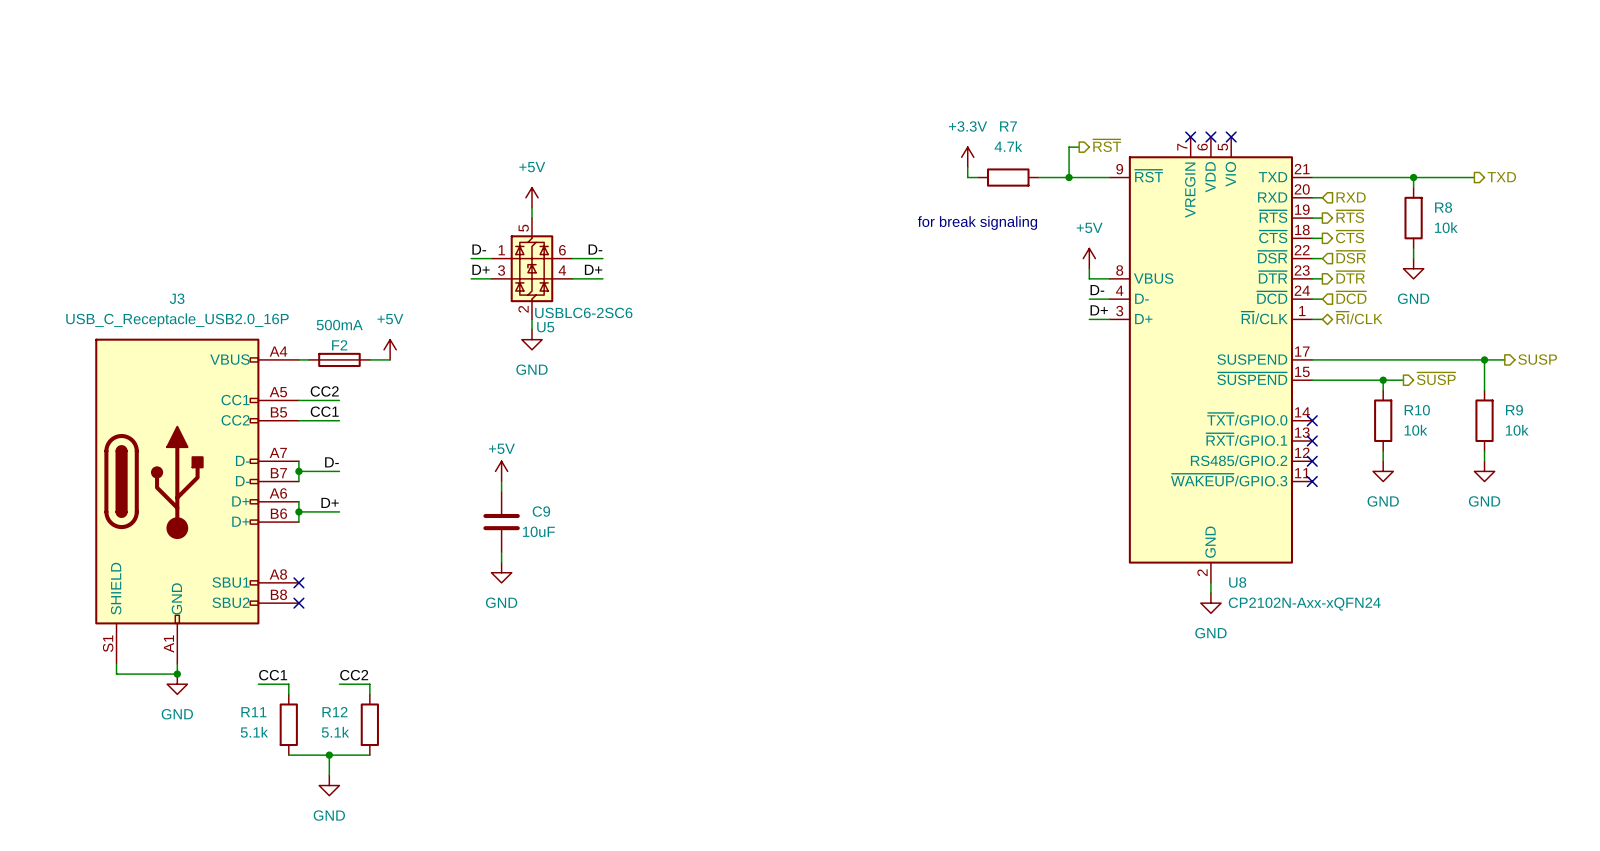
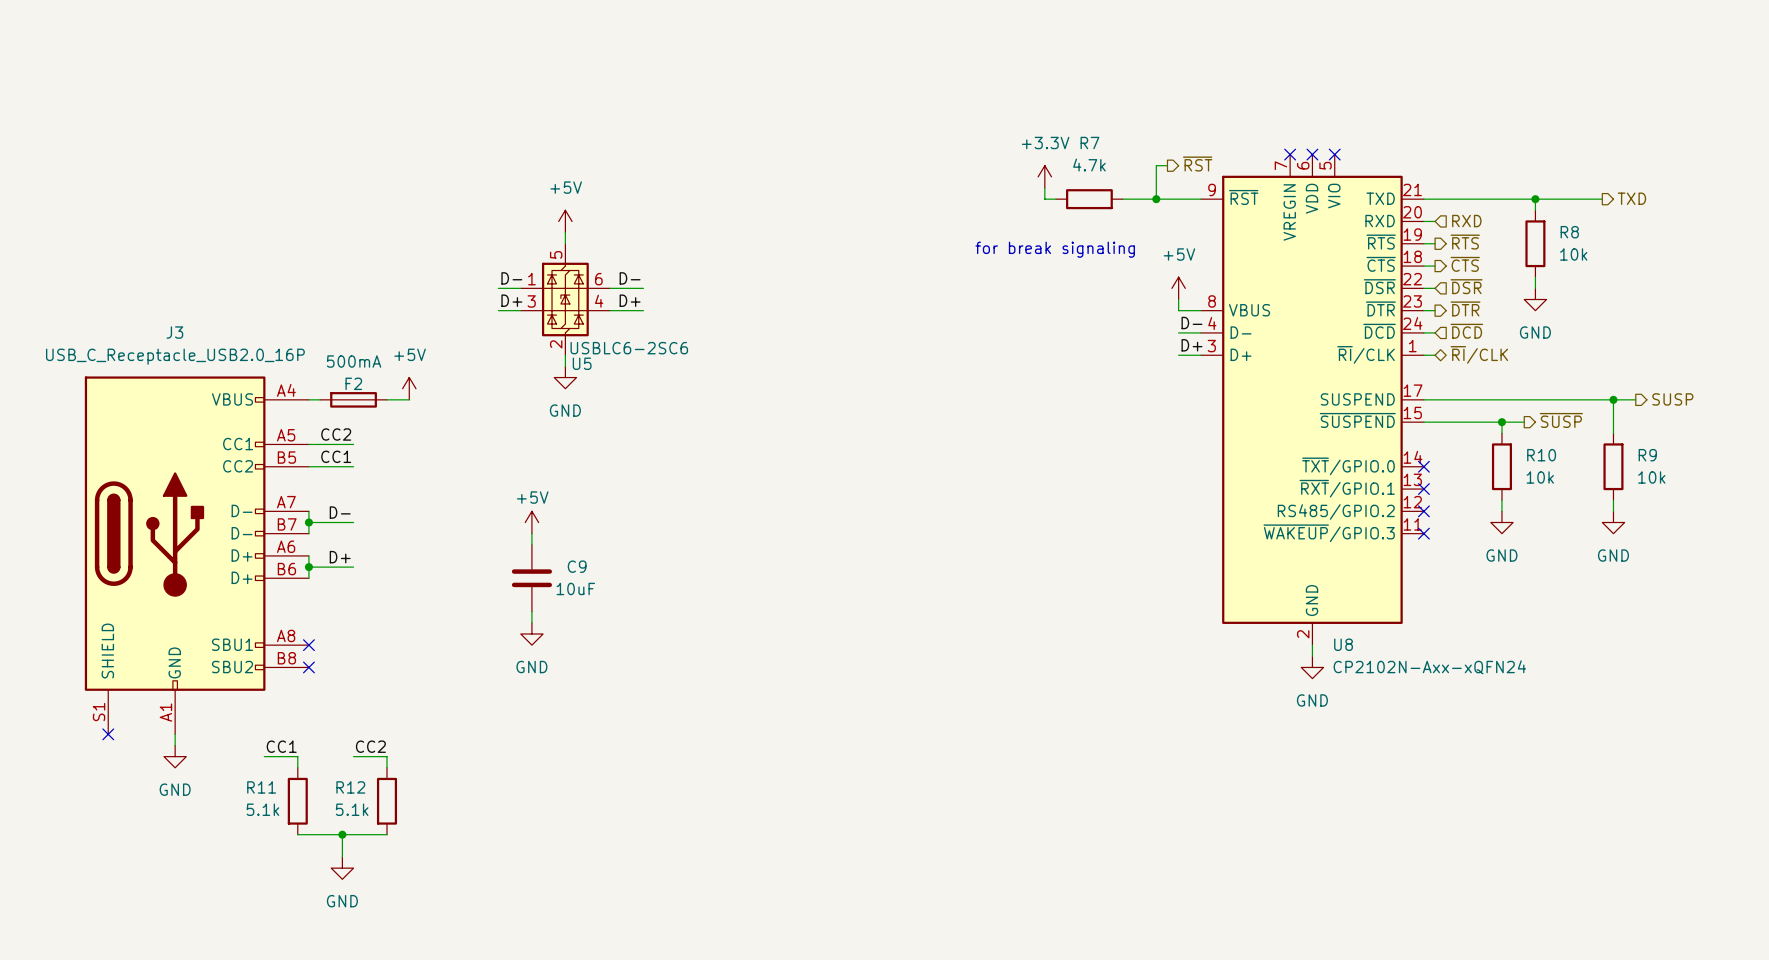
wire: (116, 663) (116, 674) (177, 674) -> none
no-connect mark: none -> (108, 734)
junction: (177, 674) -> none

